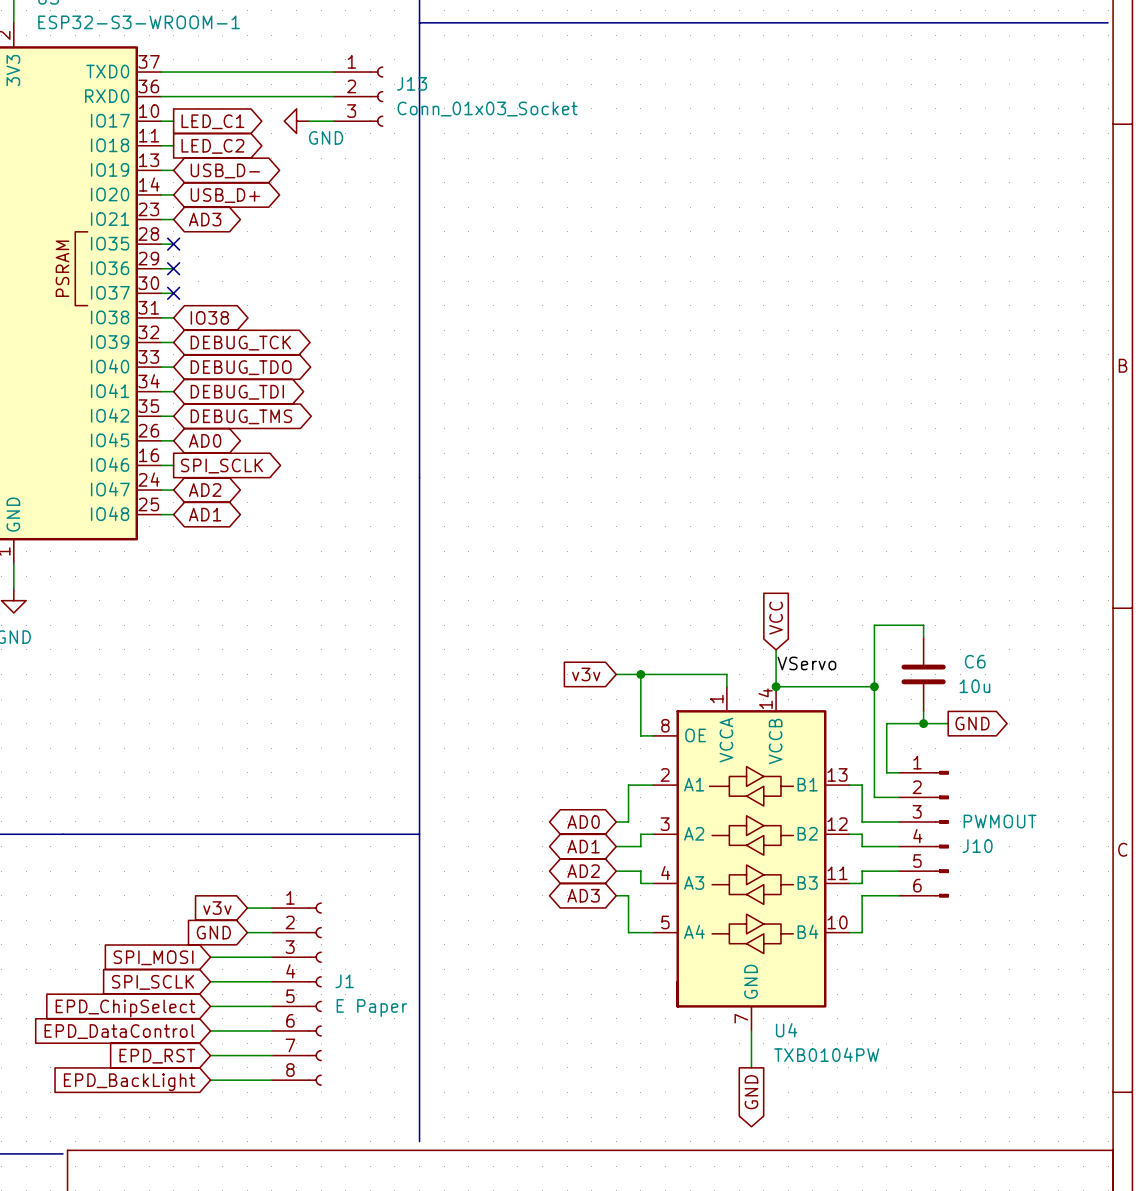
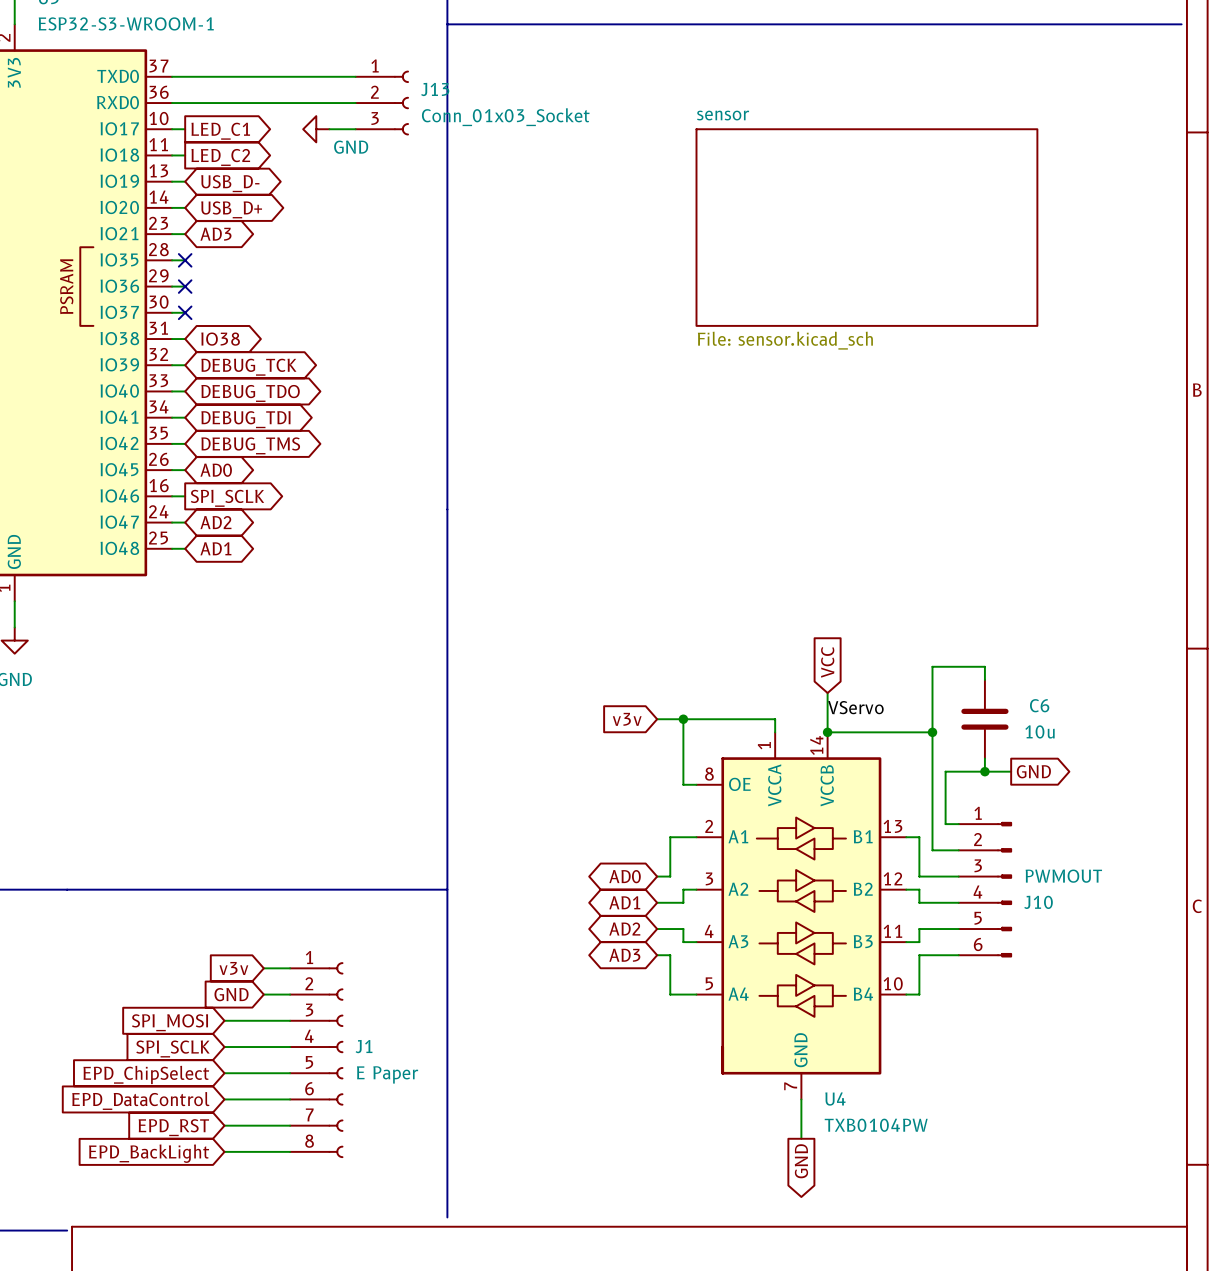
sheet sensor: none -> File: sensor.kicad_sch (866, 227)

